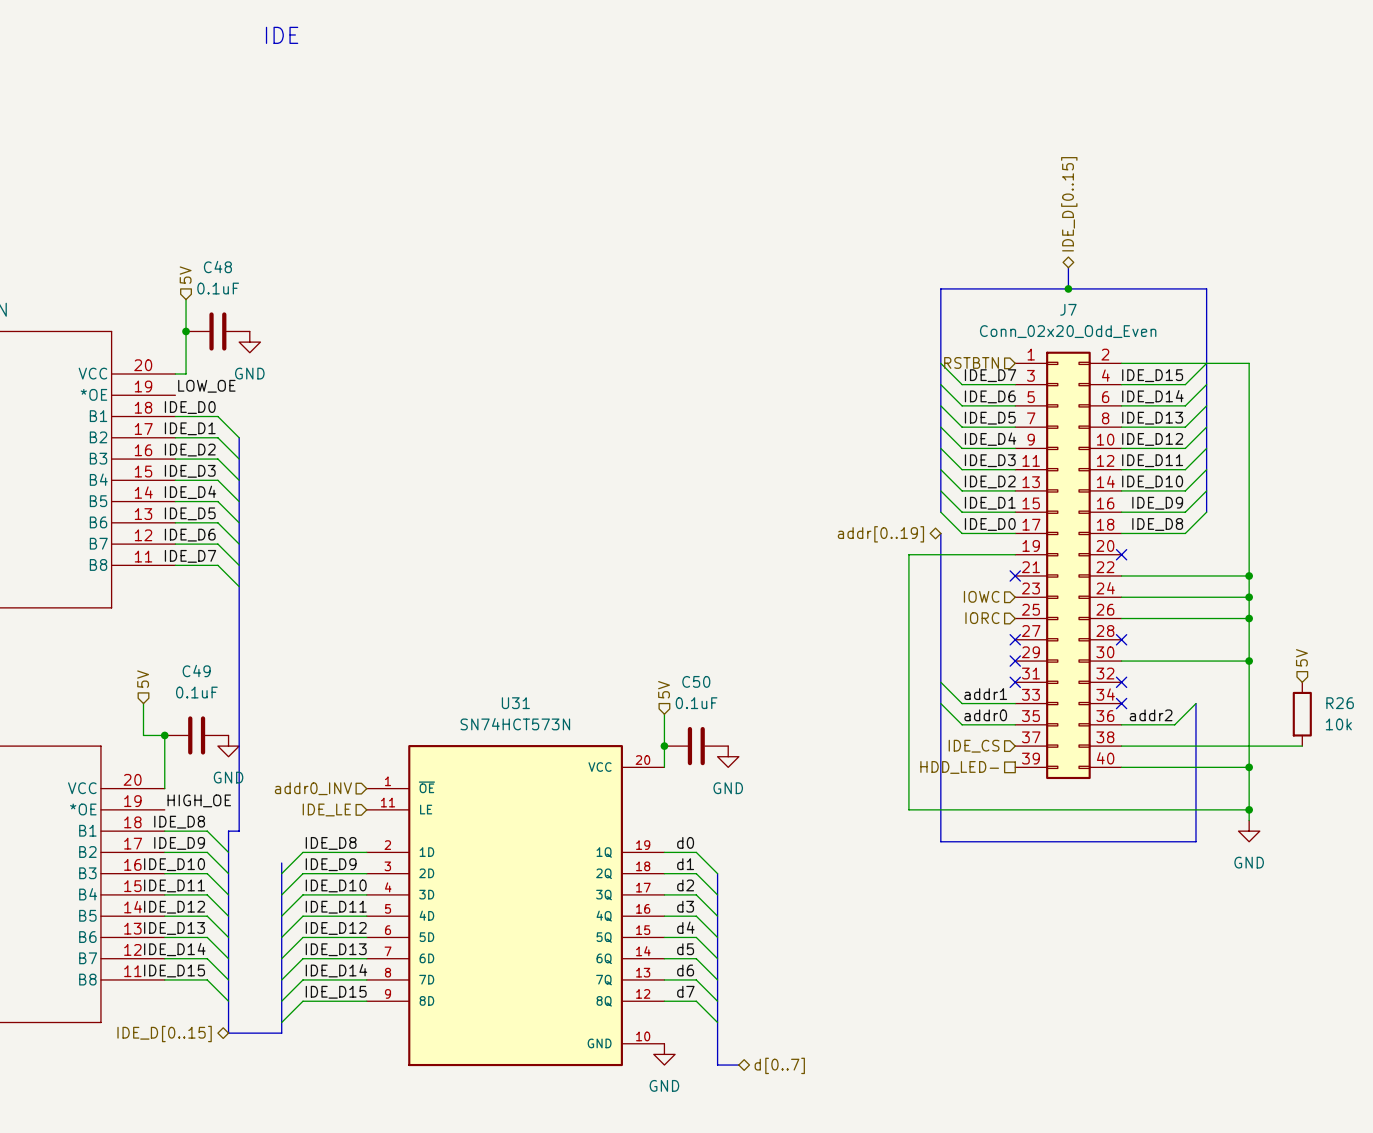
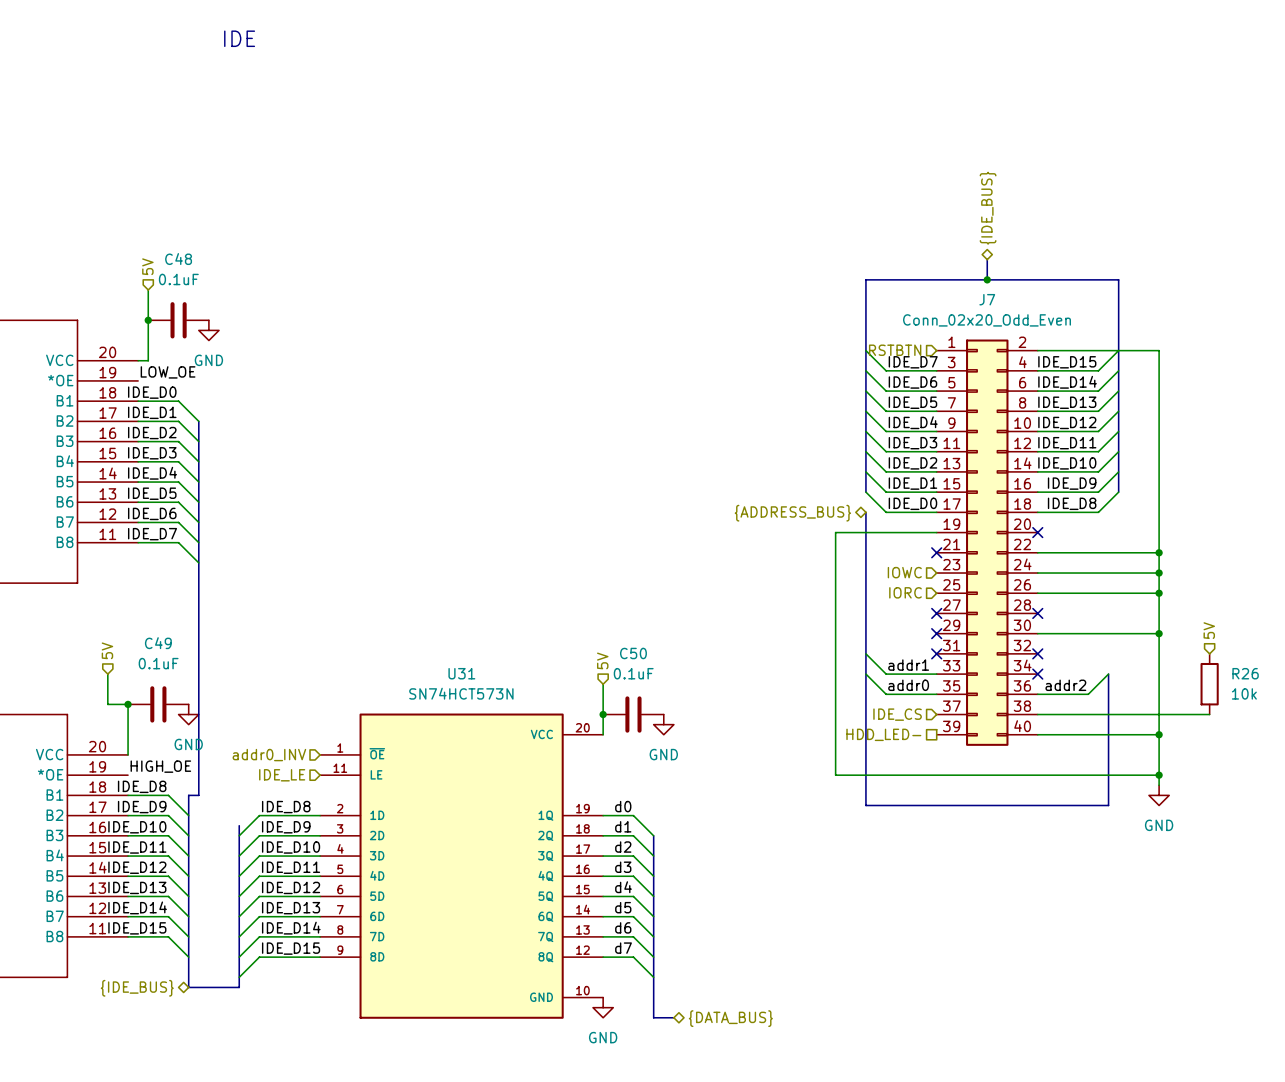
hierarchical label: IDE_D[0..15] (1069, 204) -> {IDE_BUS} (988, 208)
hierarchical label: addr[0..19] (880, 534) -> {ADDRESS_BUS} (792, 513)
hierarchical label: IDE_D[0..15] (164, 1034) -> {IDE_BUS} (137, 988)
hierarchical label: d[0..7] (779, 1065) -> {DATA_BUS} (730, 1018)

